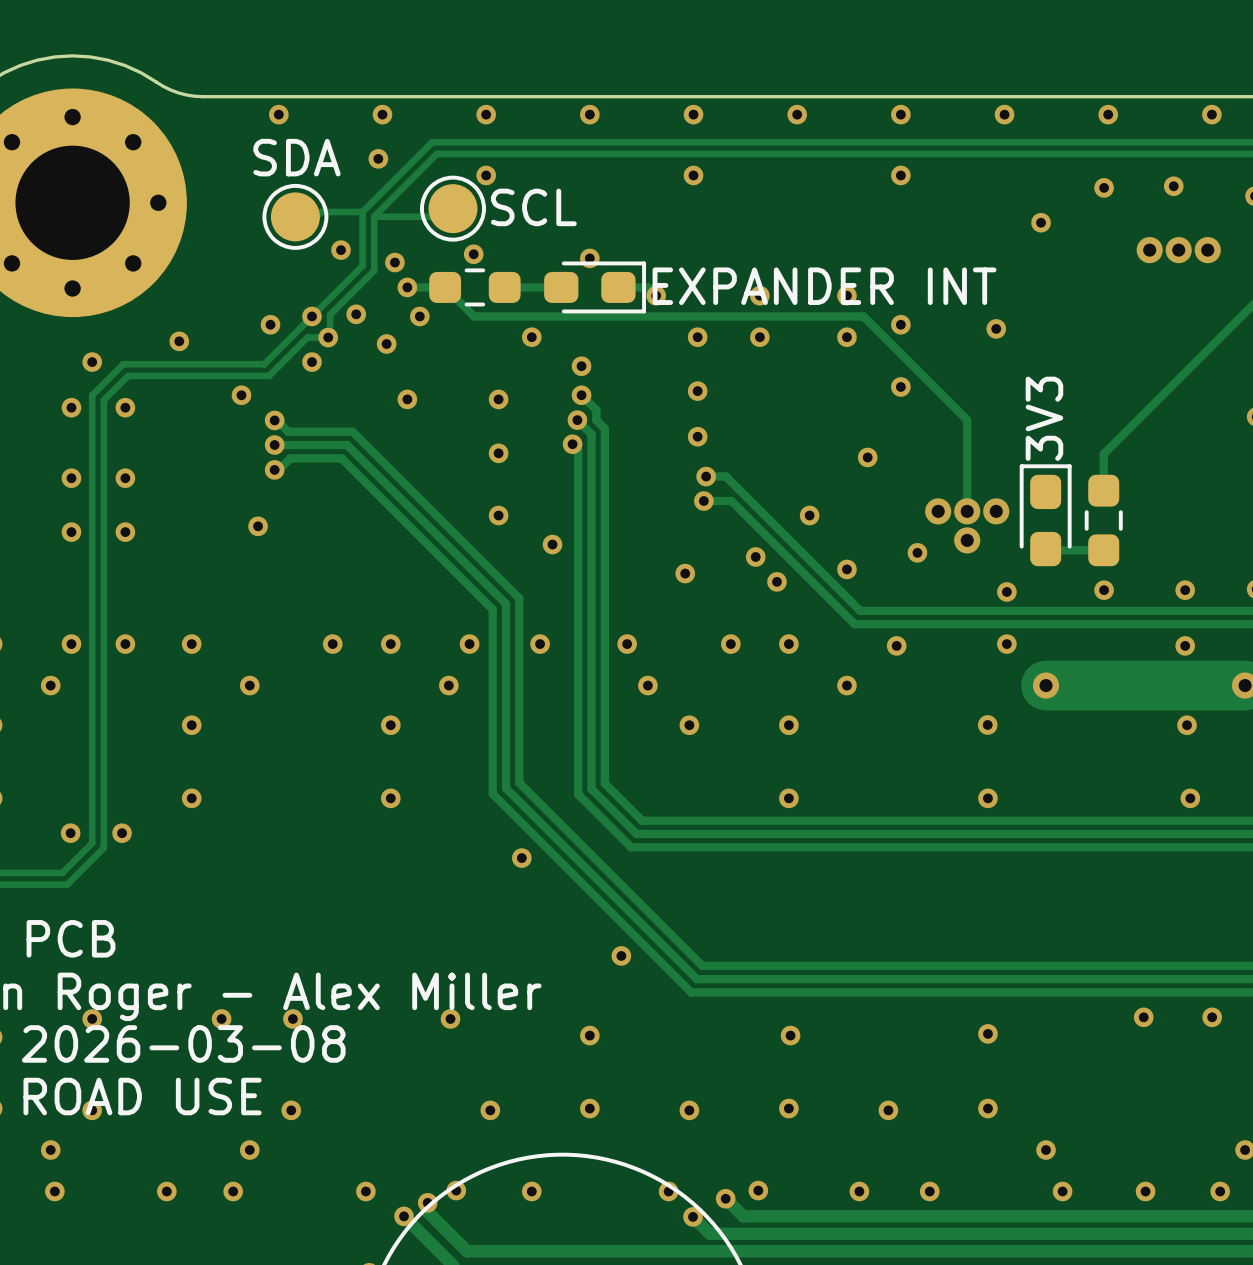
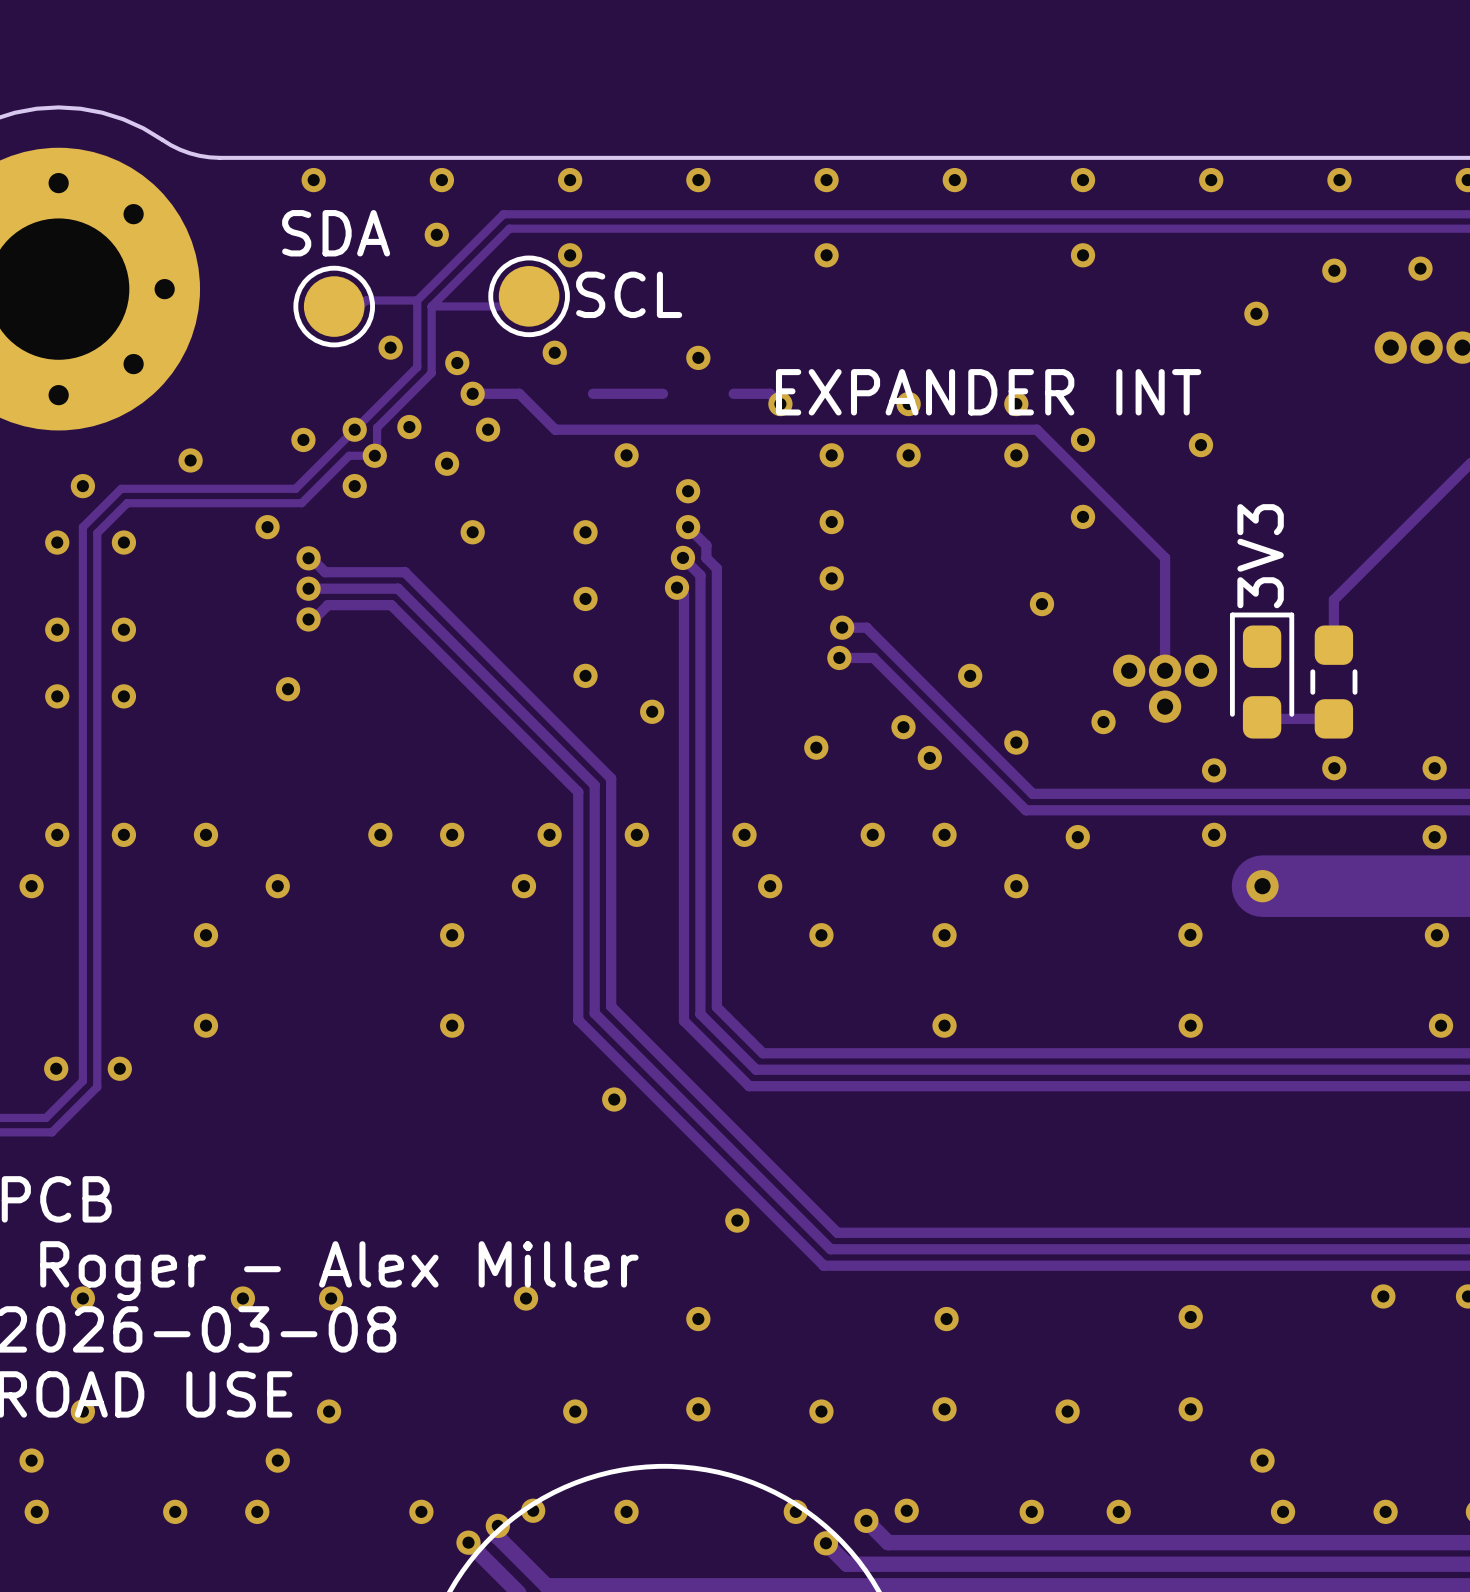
part: (474, 287) -> none
part: (595, 287) -> none

